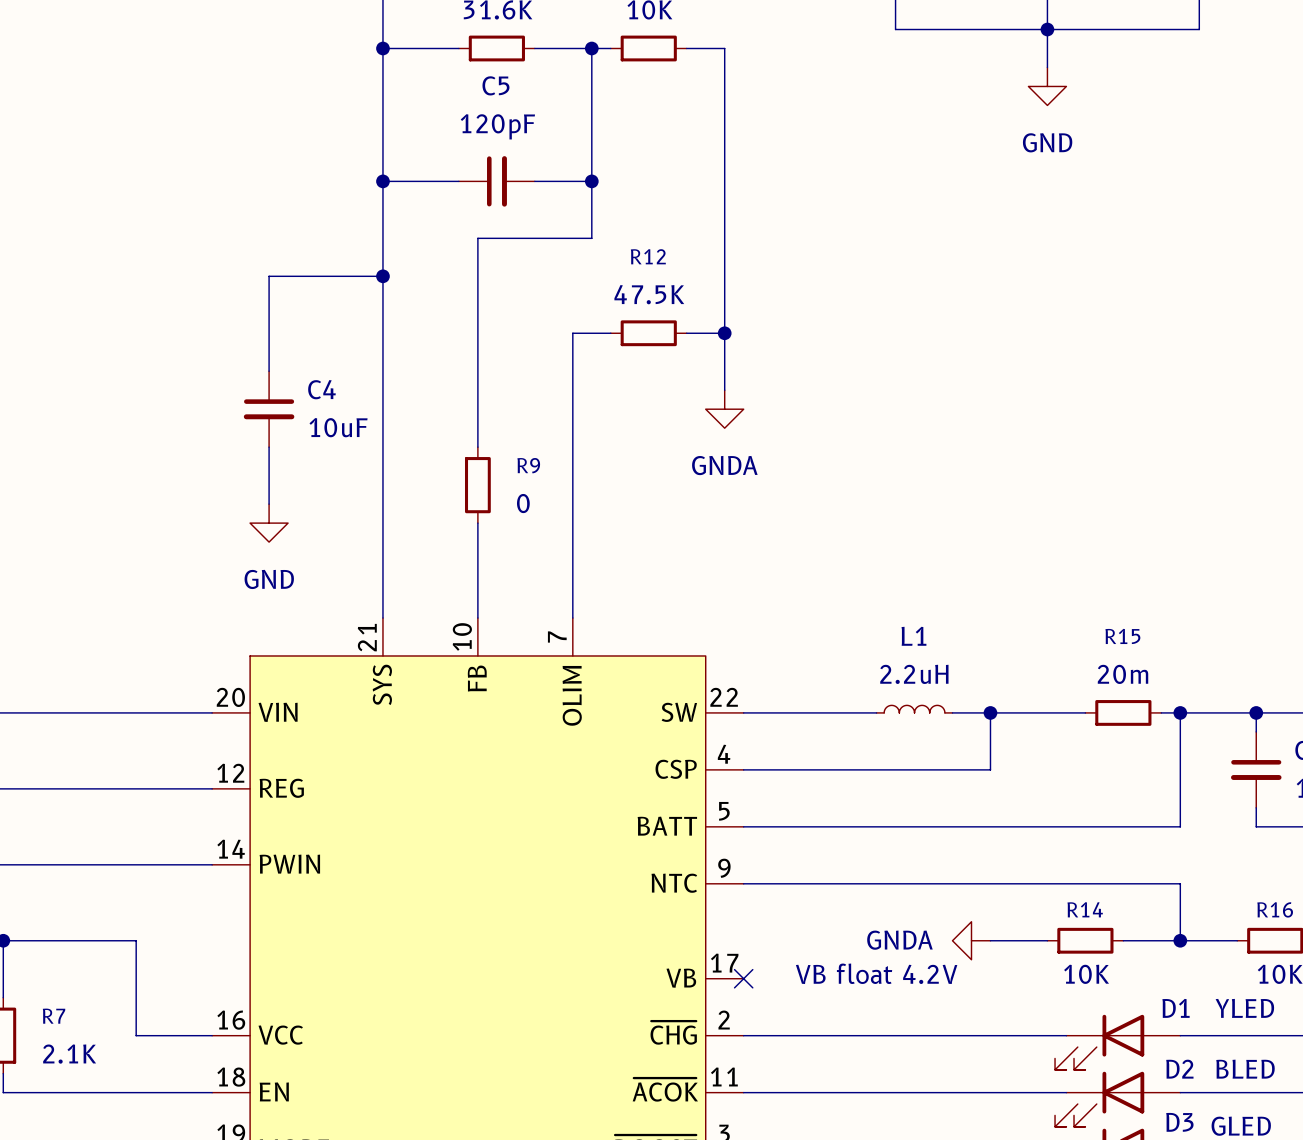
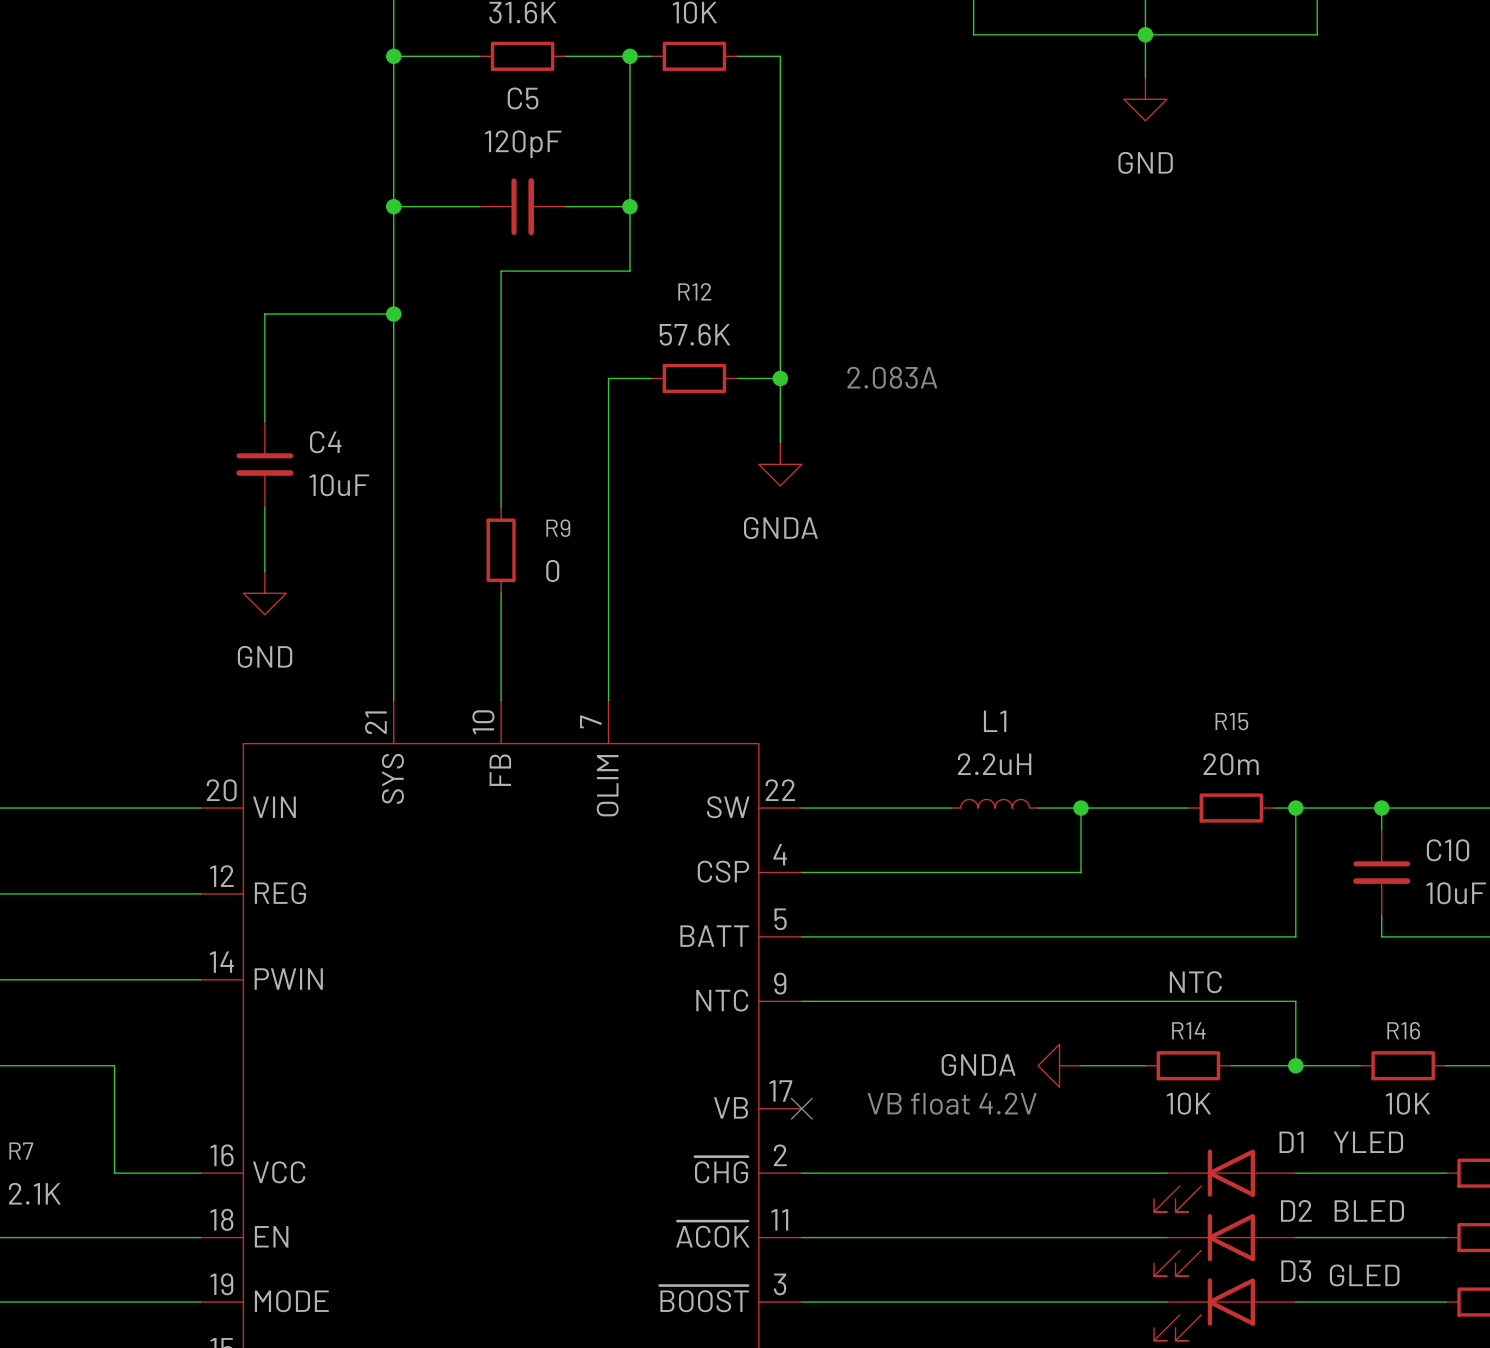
R12 value: 47.5K (649, 294) -> 57.6K (695, 334)
text: none -> 2.083A (892, 377)
label: none -> NTC (1195, 982)

